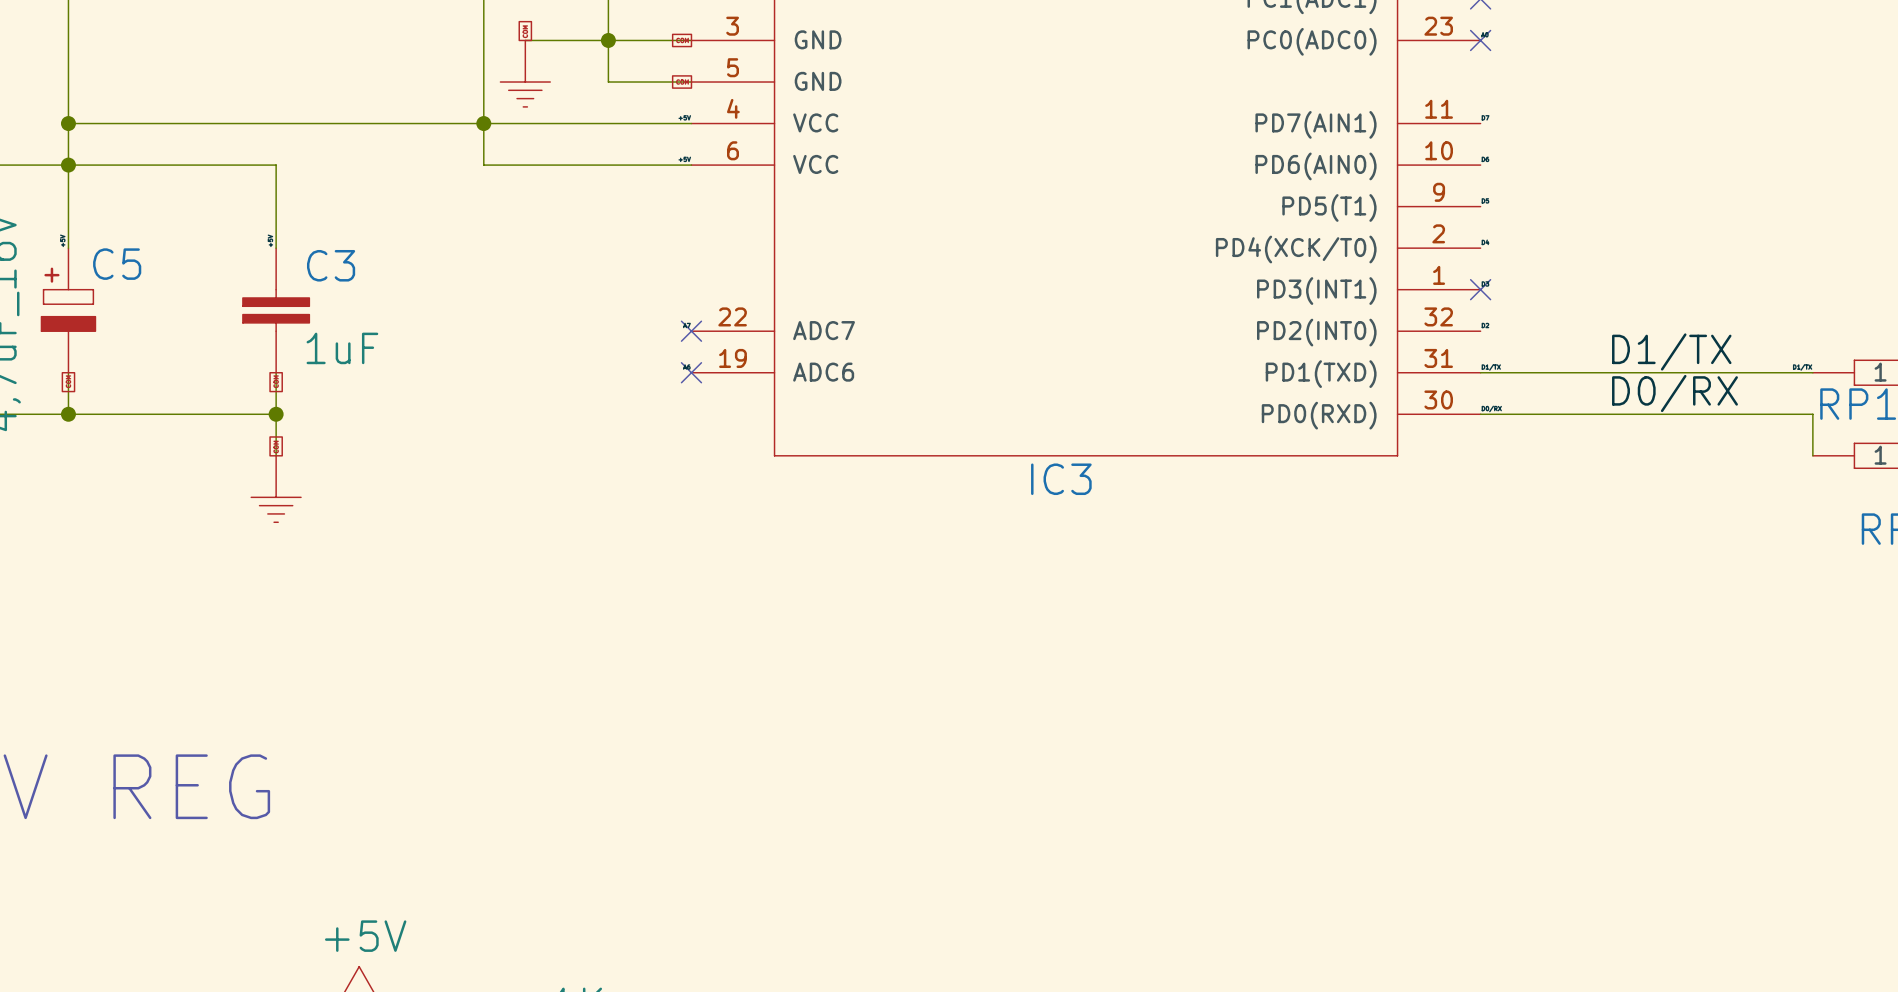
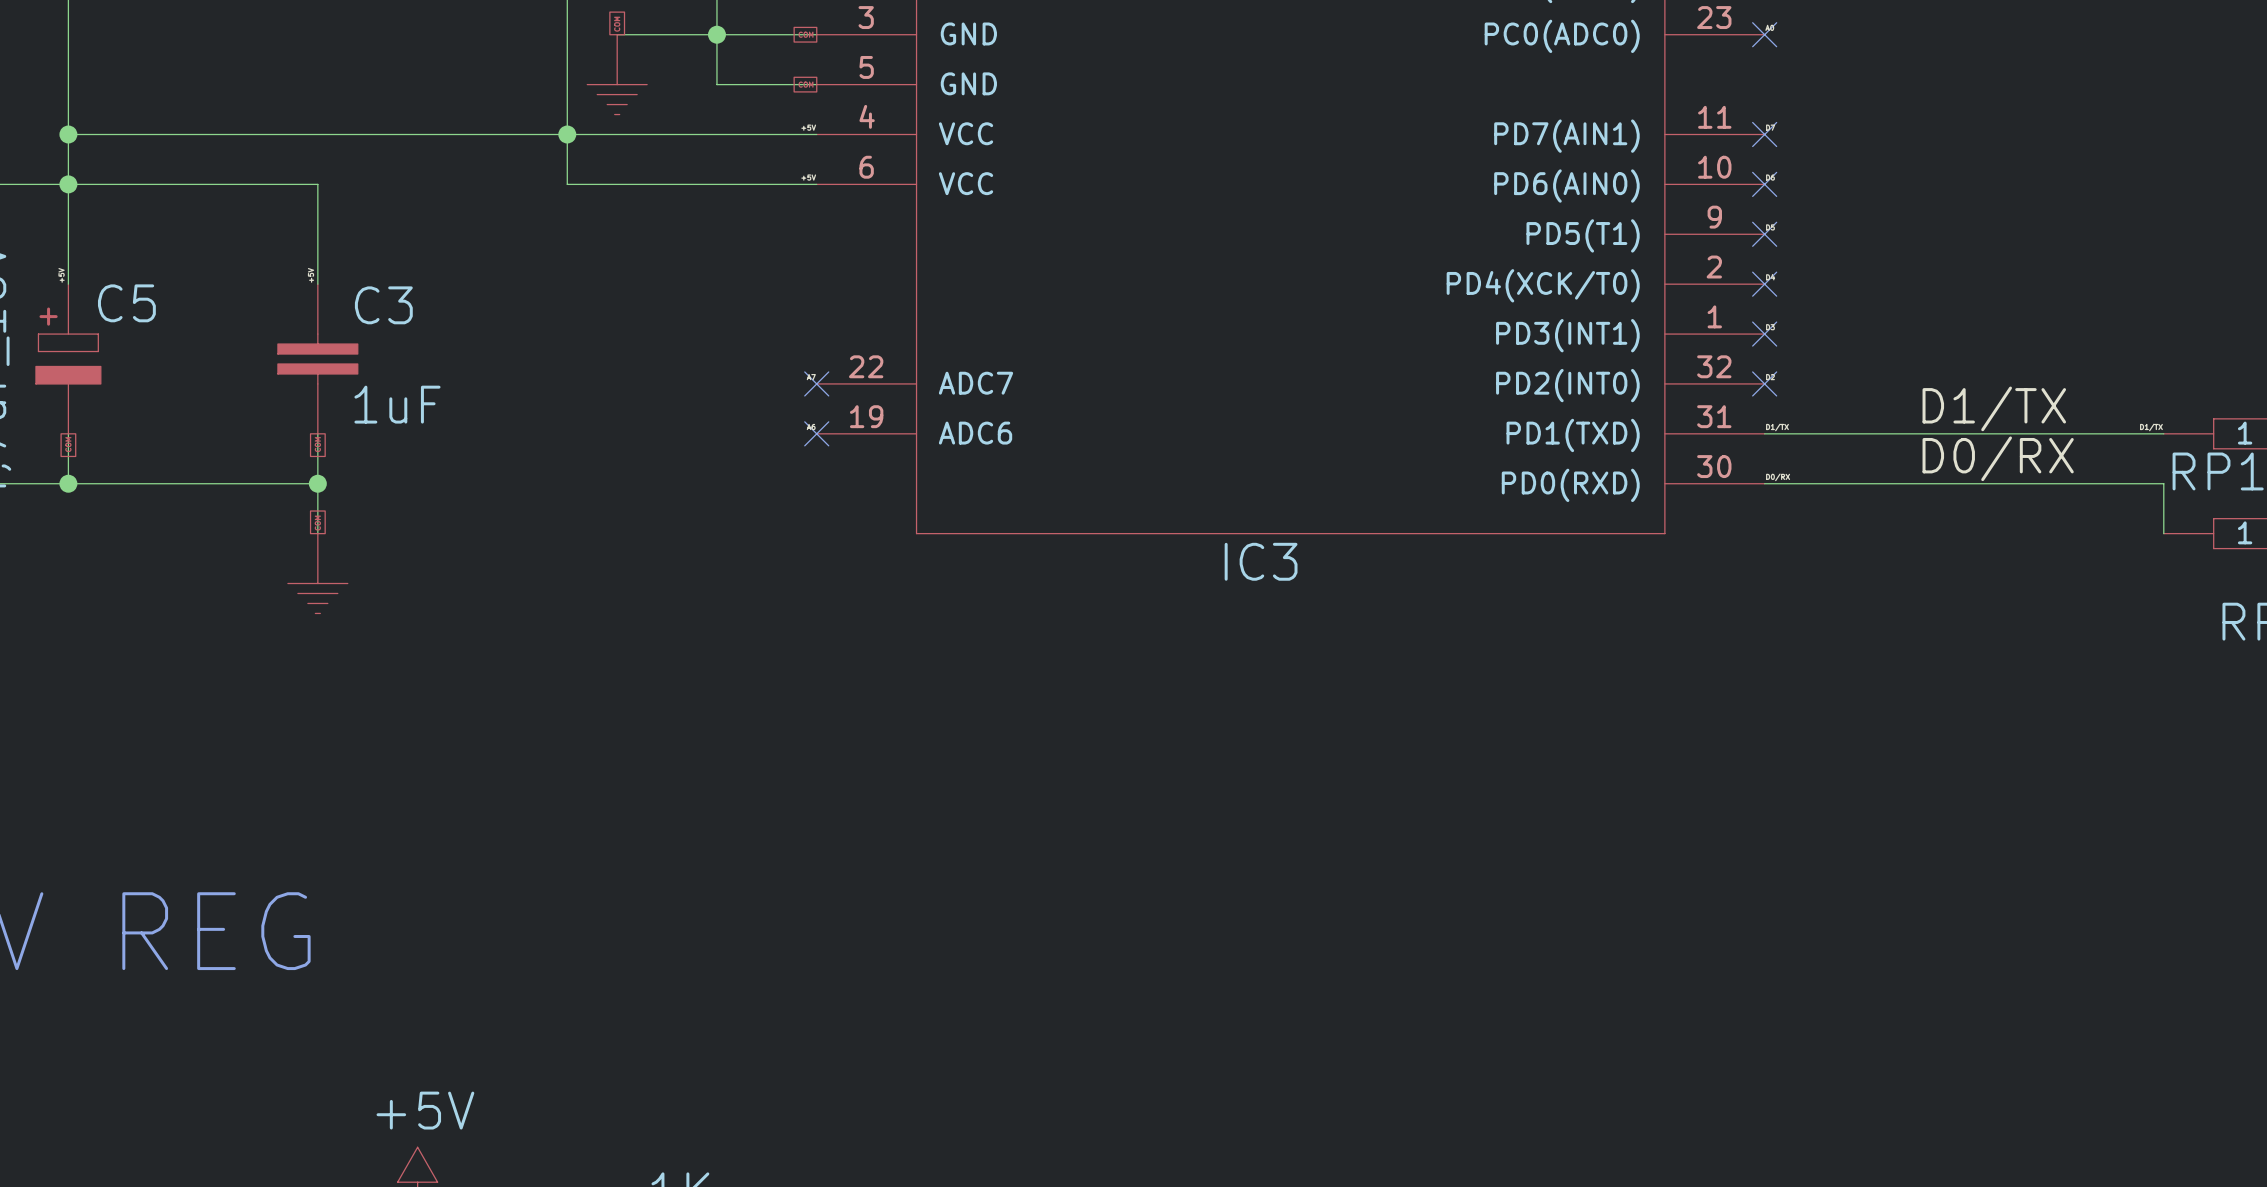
no-connect mark: none -> (1764, 134)
no-connect mark: none -> (1764, 184)
no-connect mark: none -> (1764, 234)
no-connect mark: none -> (1764, 284)
no-connect mark: none -> (1764, 383)

